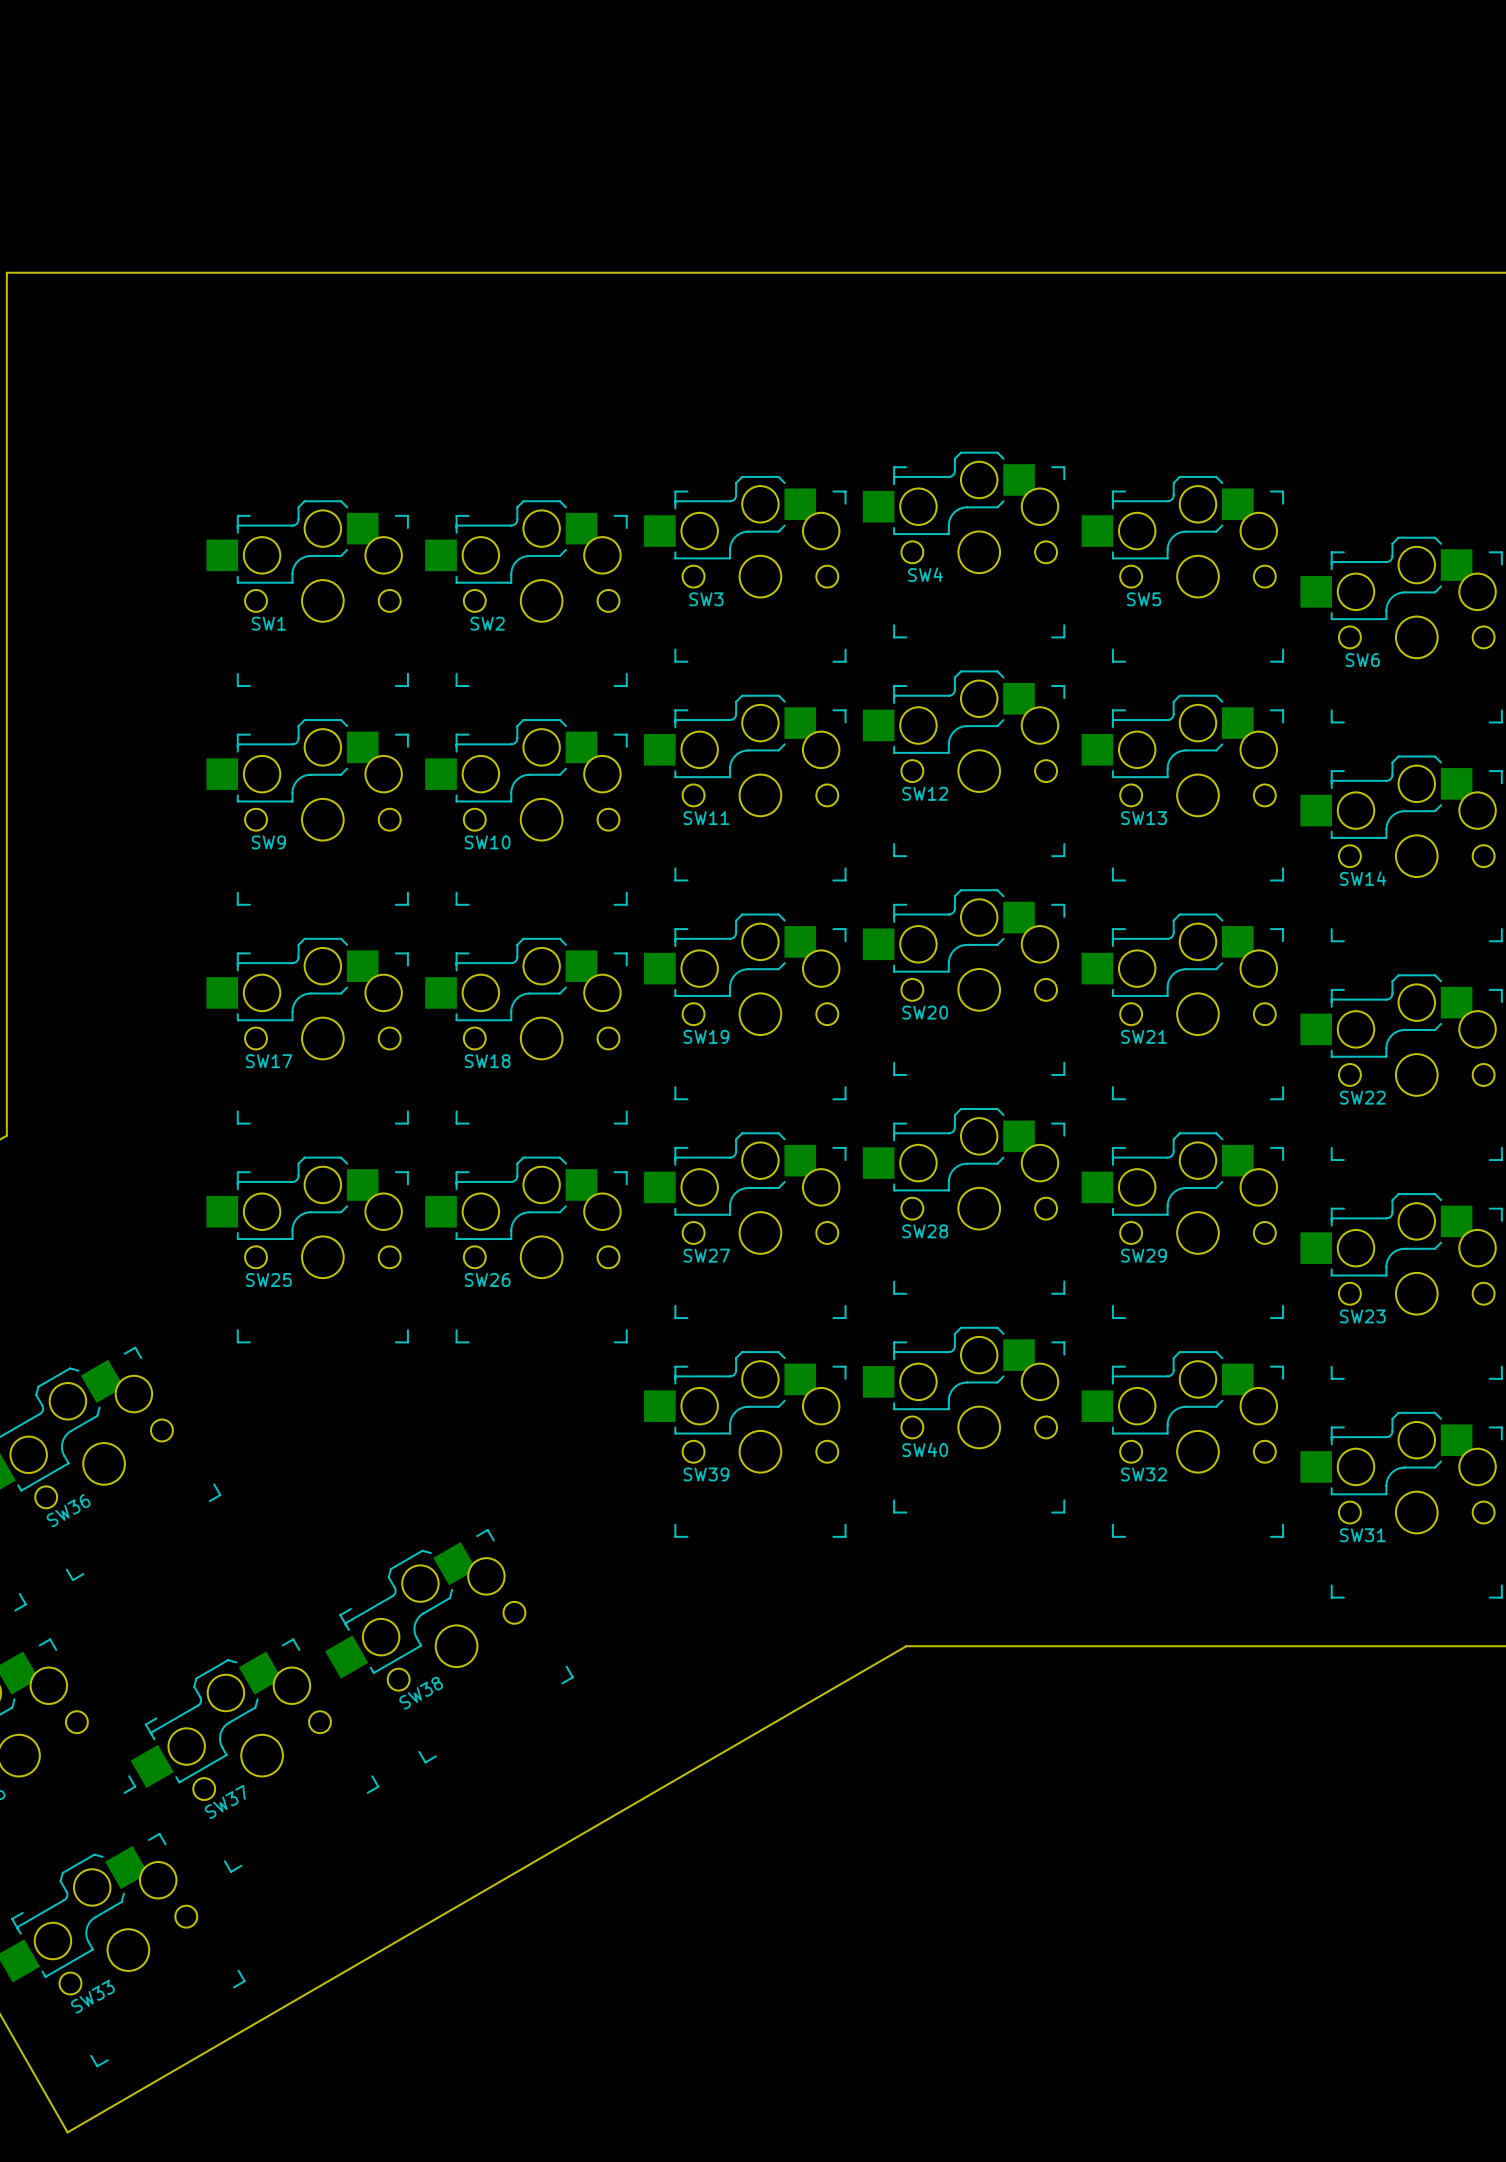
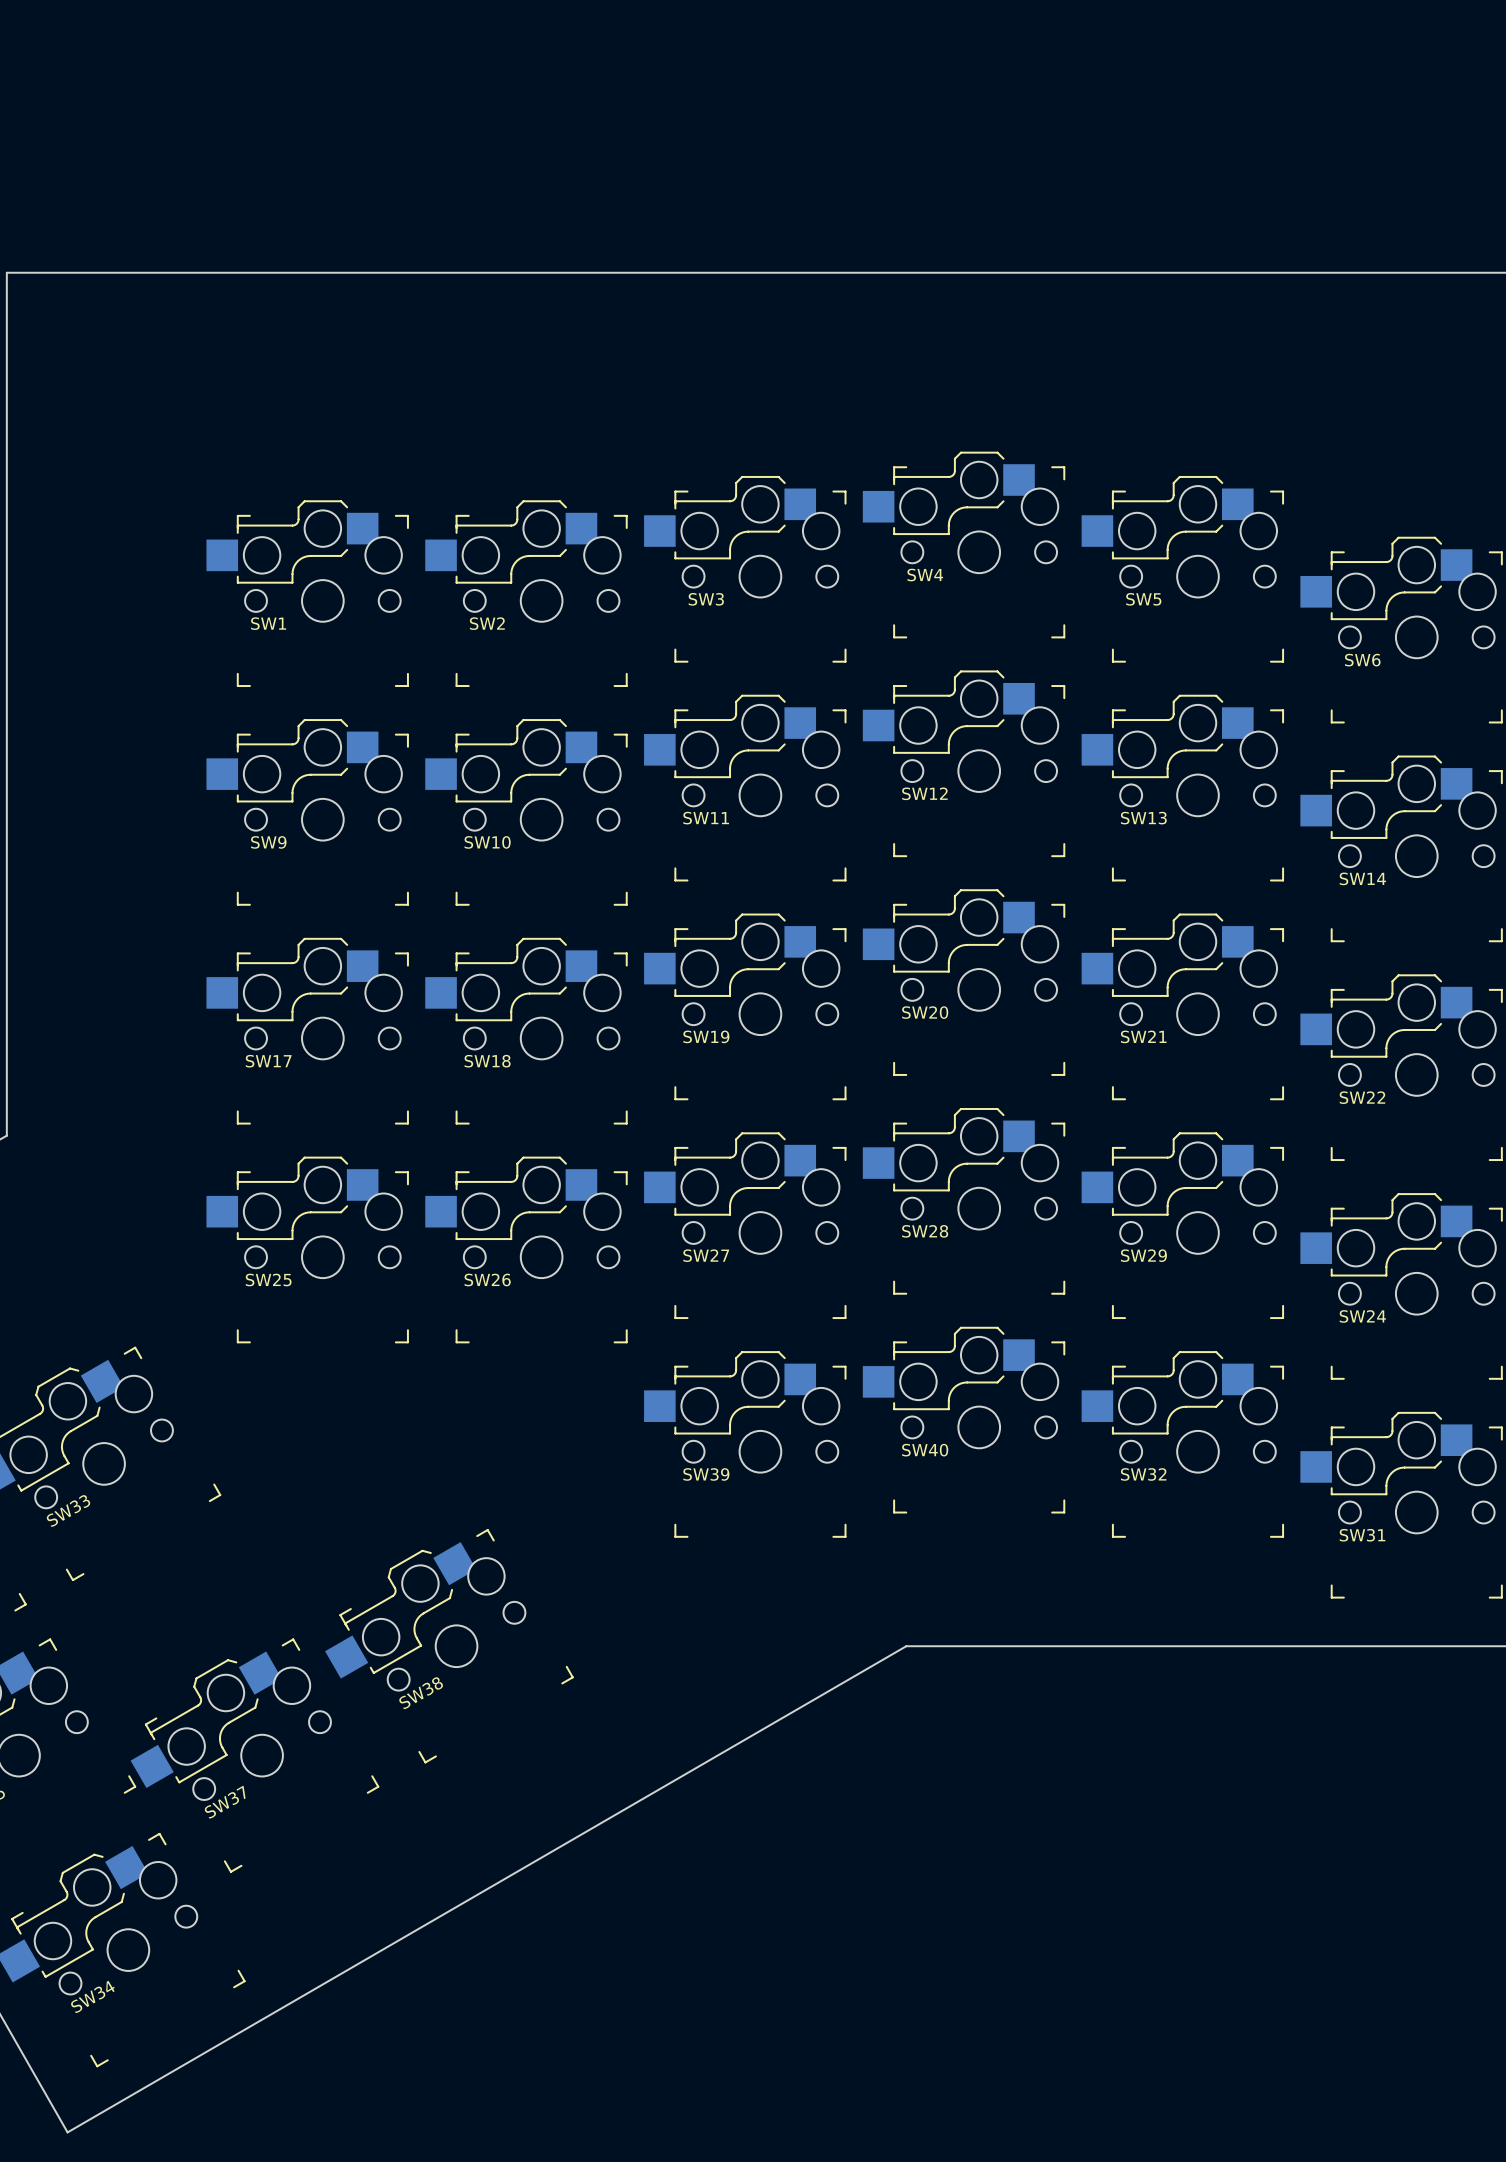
SW23 name: SW23 (1362, 1316) -> SW24 (1362, 1316)
SW36 name: SW36 (68, 1510) -> SW33 (68, 1510)
SW33 name: SW33 (92, 1996) -> SW34 (92, 1996)

